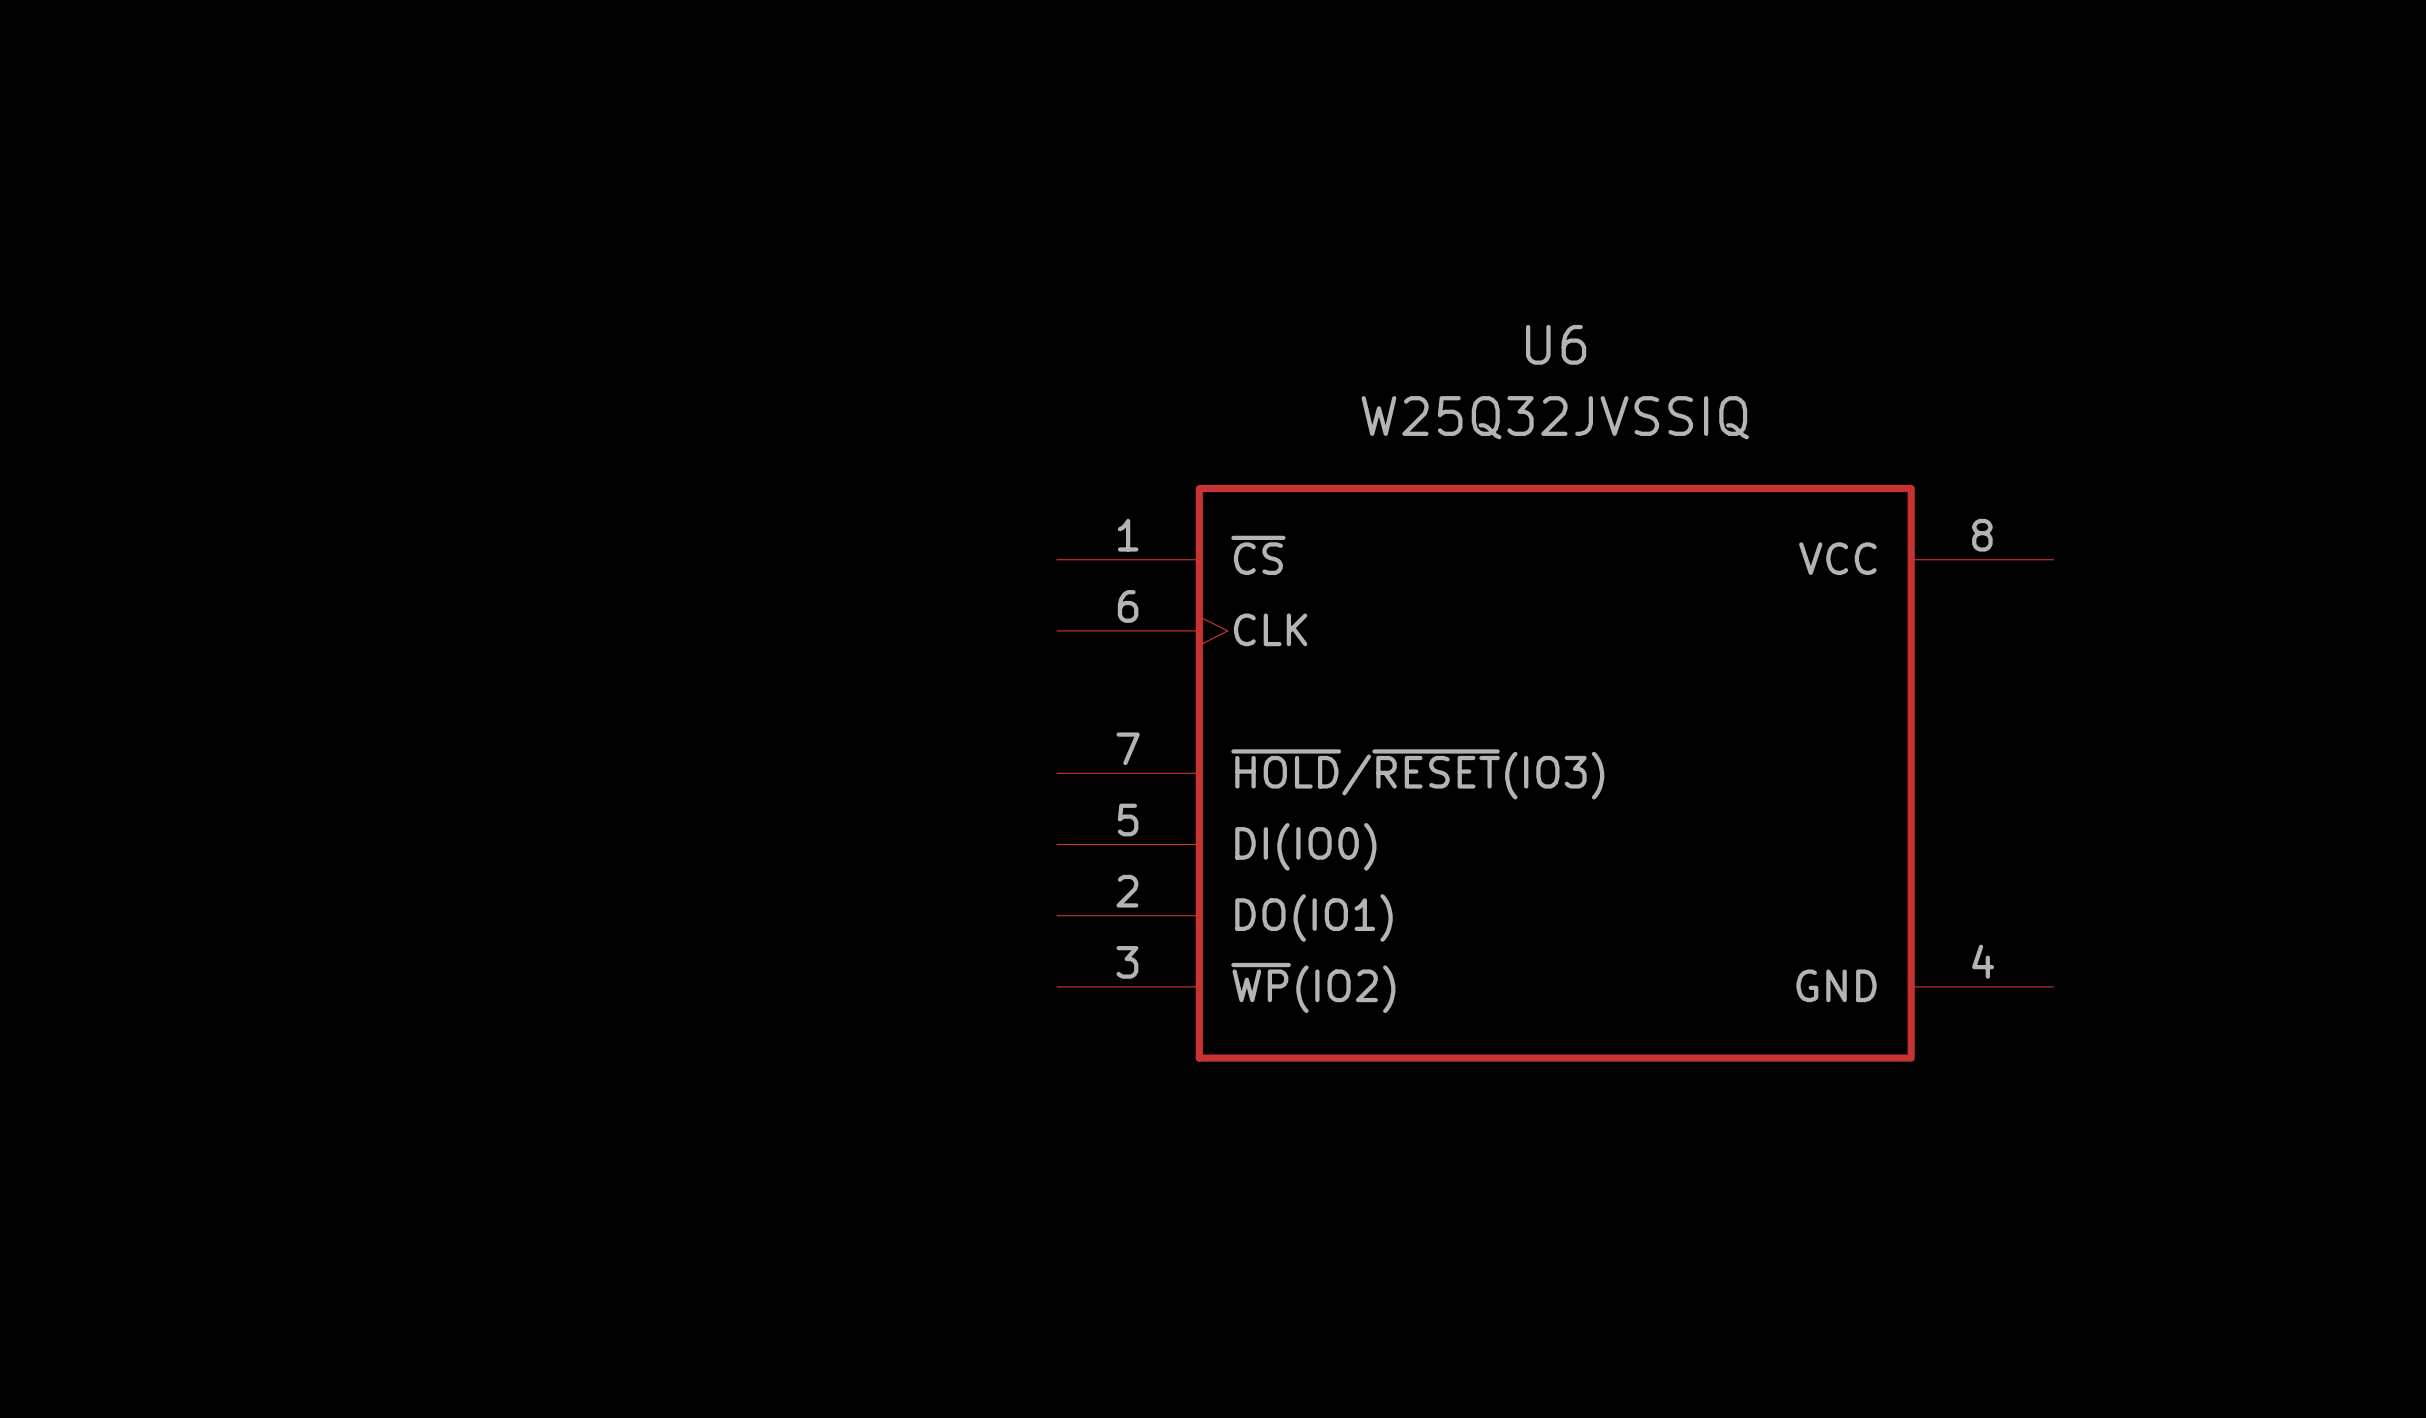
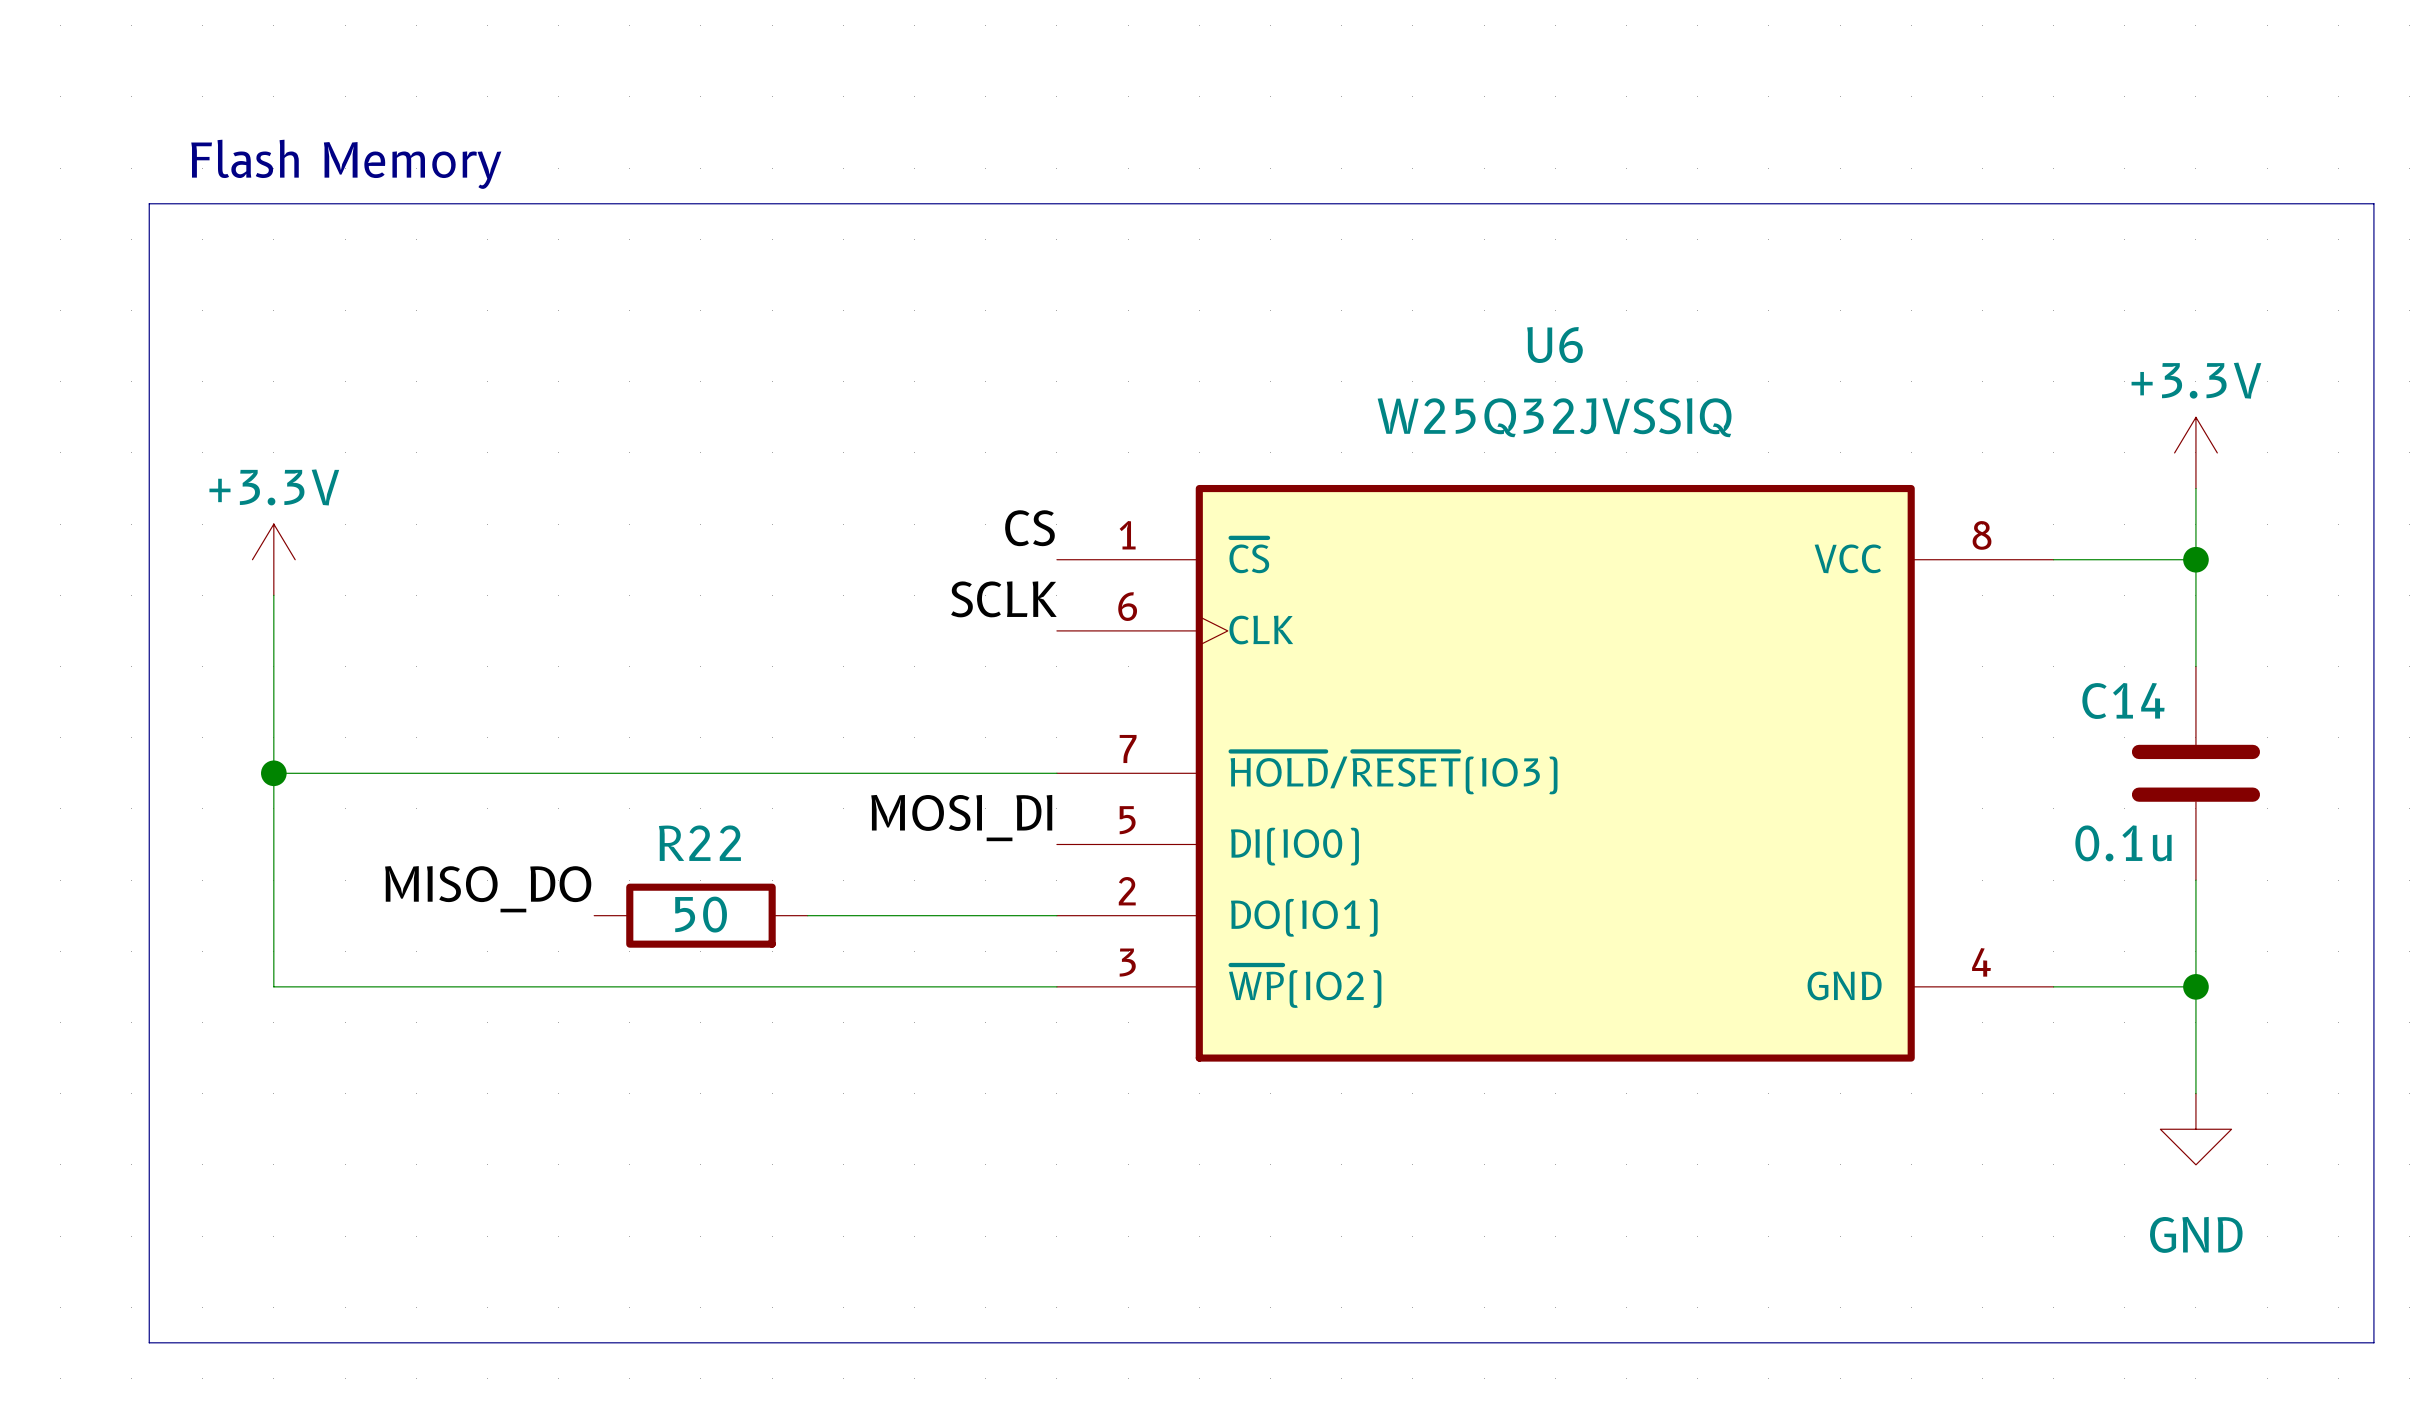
text: none -> Flash Memory (346, 164)
line: none -> (149, 203) (2373, 203) (2373, 1342) (149, 1342) (149, 203)
power symbol: none -> +3.3V (2195, 452)
wire: none -> (2195, 488) (2195, 666)
label: none -> CS (1029, 528)
power symbol: none -> +3.3V (273, 559)
wire: none -> (2053, 559) (2195, 559)
junction: none -> (2195, 559)
wire: none -> (273, 595) (273, 986) (1056, 986)
label: none -> SCLK (1003, 599)
wire: none -> (273, 773) (1056, 773)
junction: none -> (273, 773)
C14: none -> 0.1u (2195, 773)
label: none -> MOSI_DI (961, 818)
wire: none -> (2195, 880) (2195, 1093)
label: none -> MISO_DO (488, 889)
R22: none -> 50 (700, 915)
wire: none -> (807, 915) (1056, 915)
wire: none -> (2053, 986) (2195, 986)
junction: none -> (2195, 986)
power symbol: none -> GND (2195, 1129)

